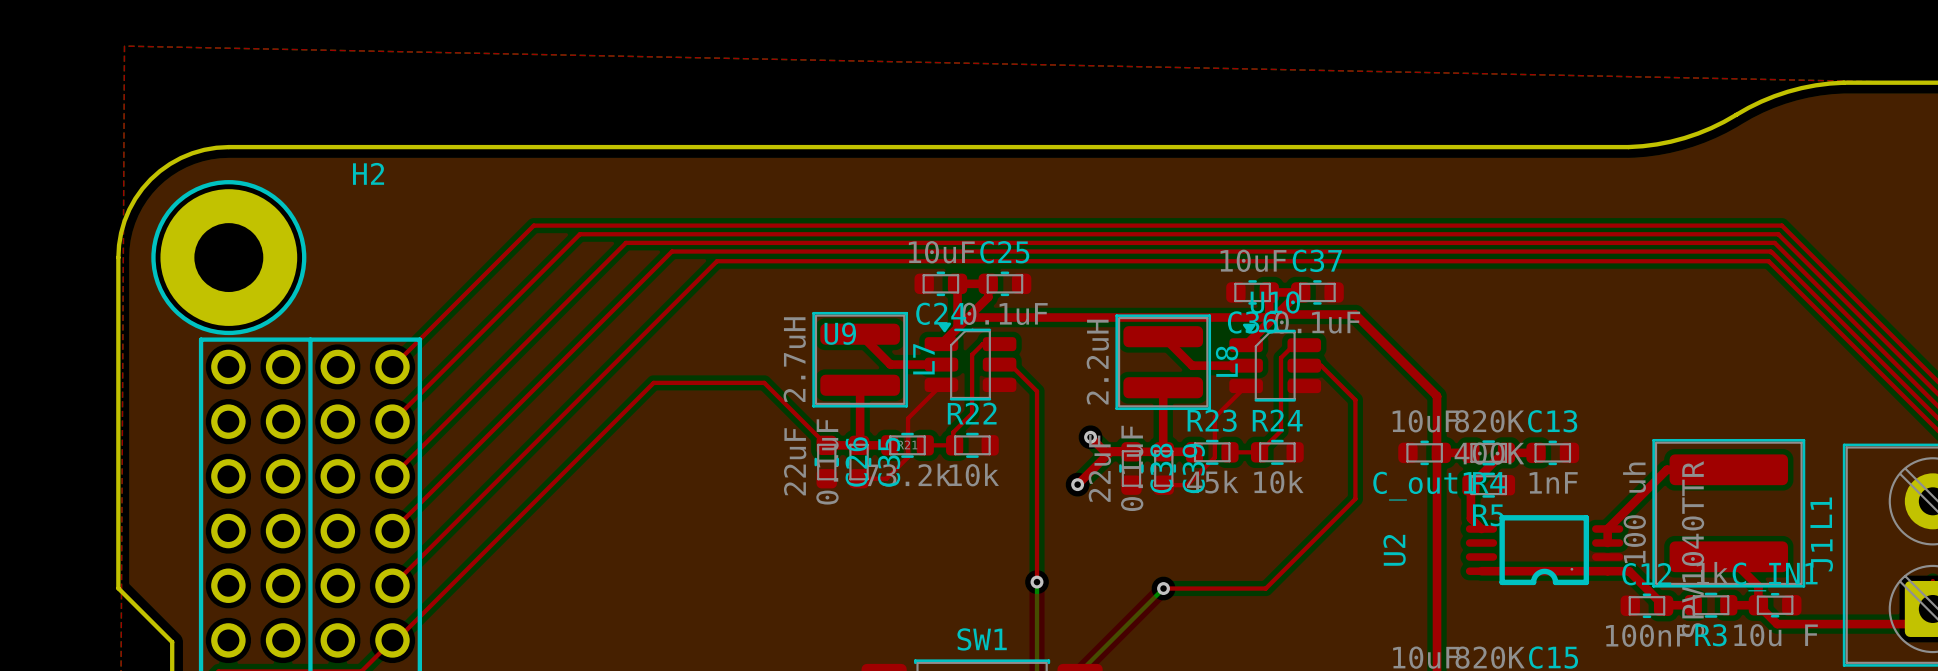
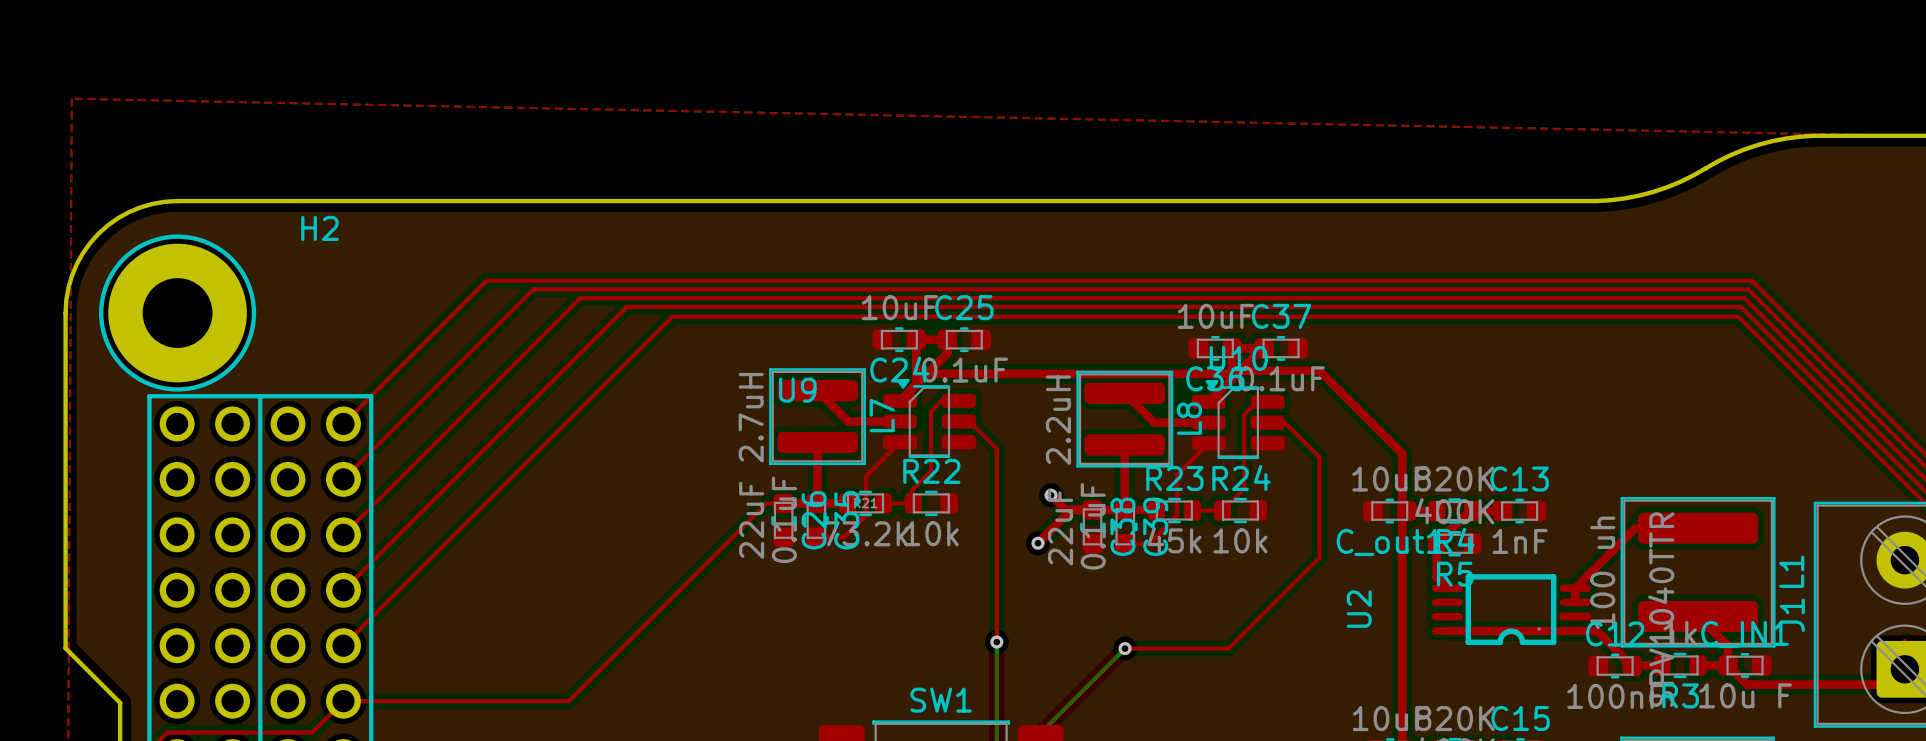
top track: (826, 445) (764, 382) (653, 382) (396, 640) -> (783, 503) (766, 503) (568, 701) (347, 701)

